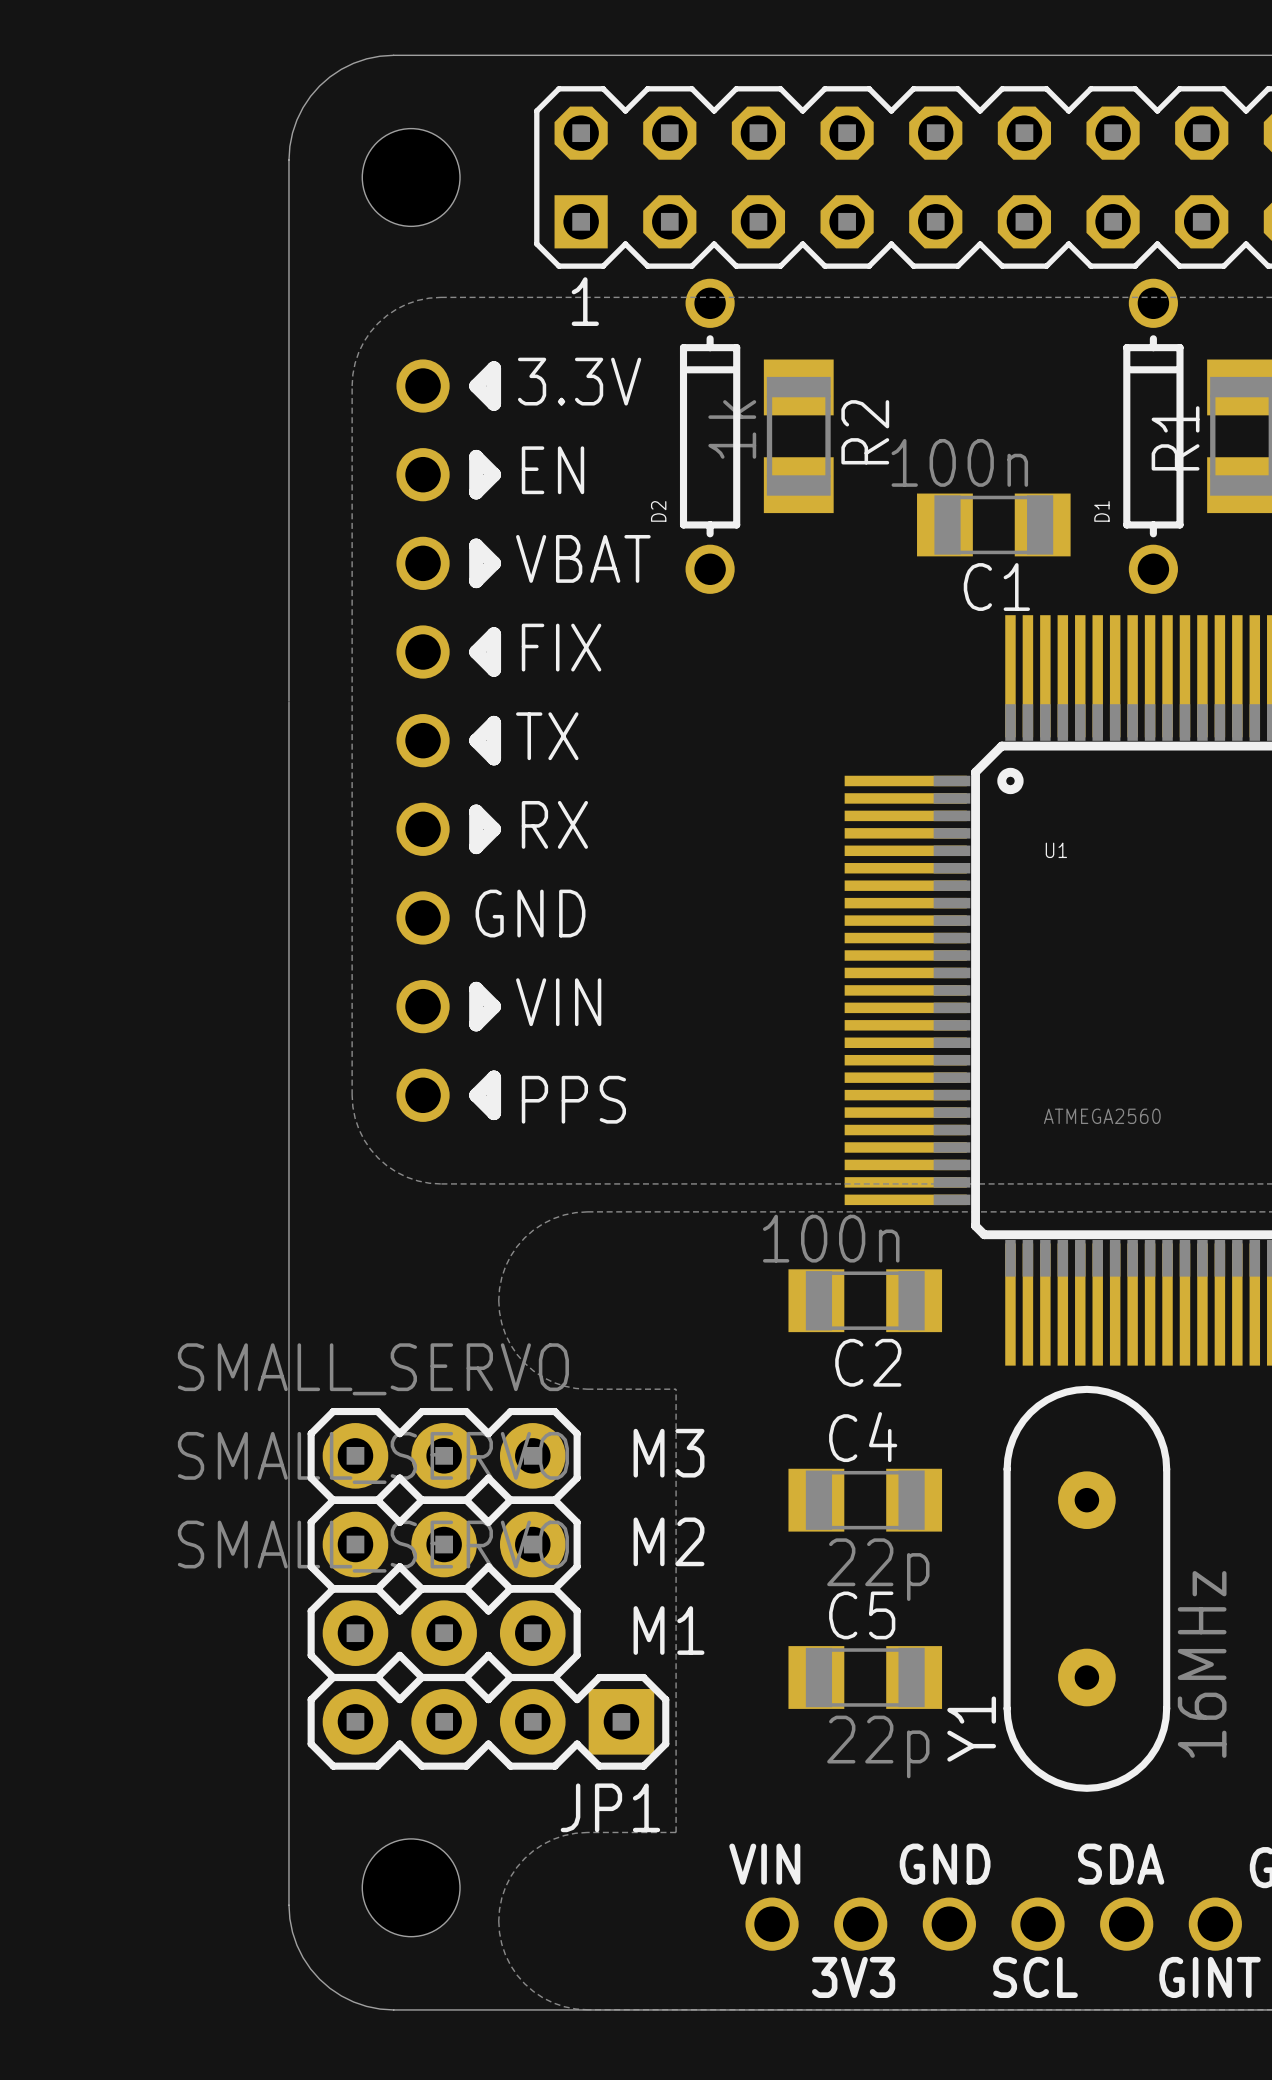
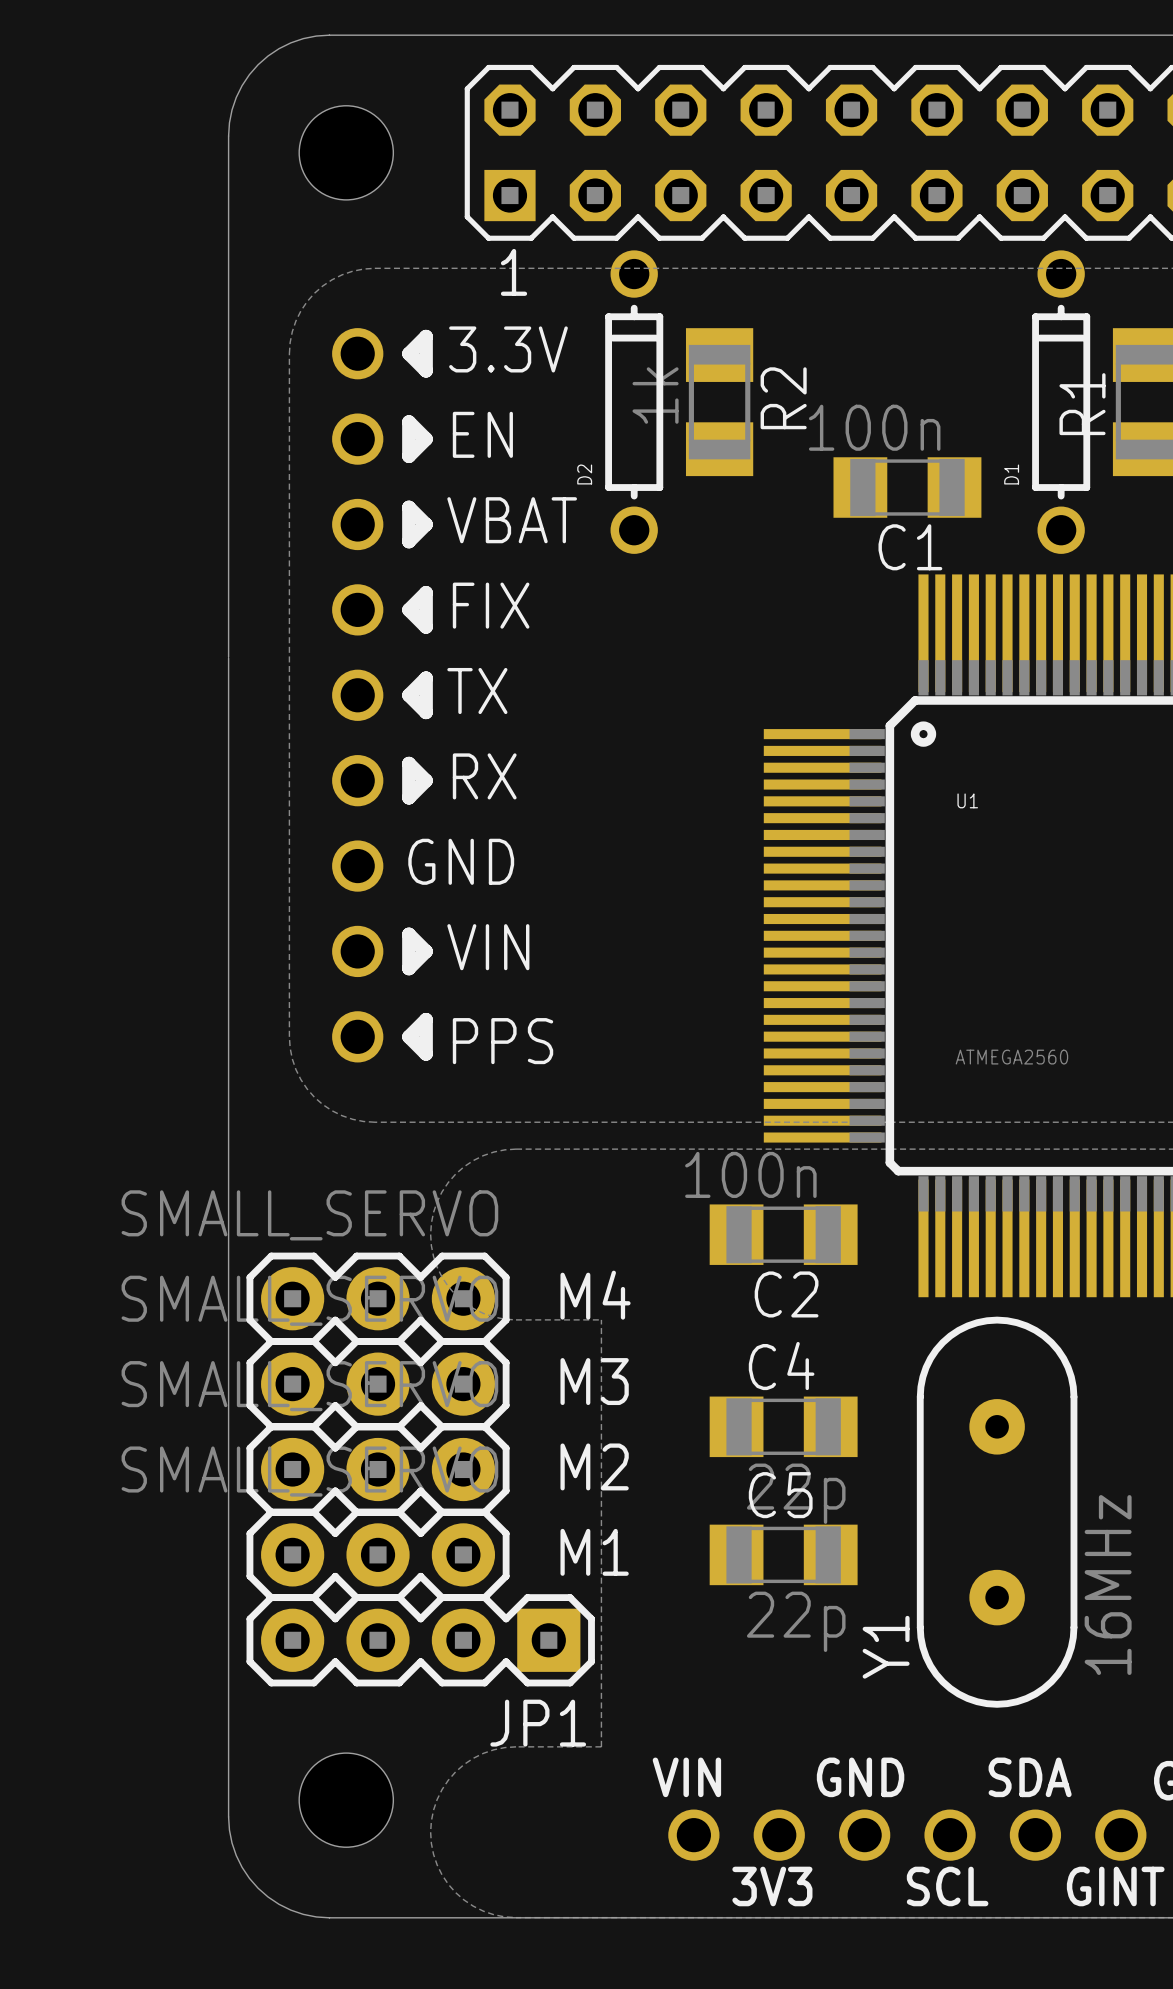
M4: none -> SMALL_SERVO (378, 1298)
C5 position: (865, 1677) -> (783, 1554)

